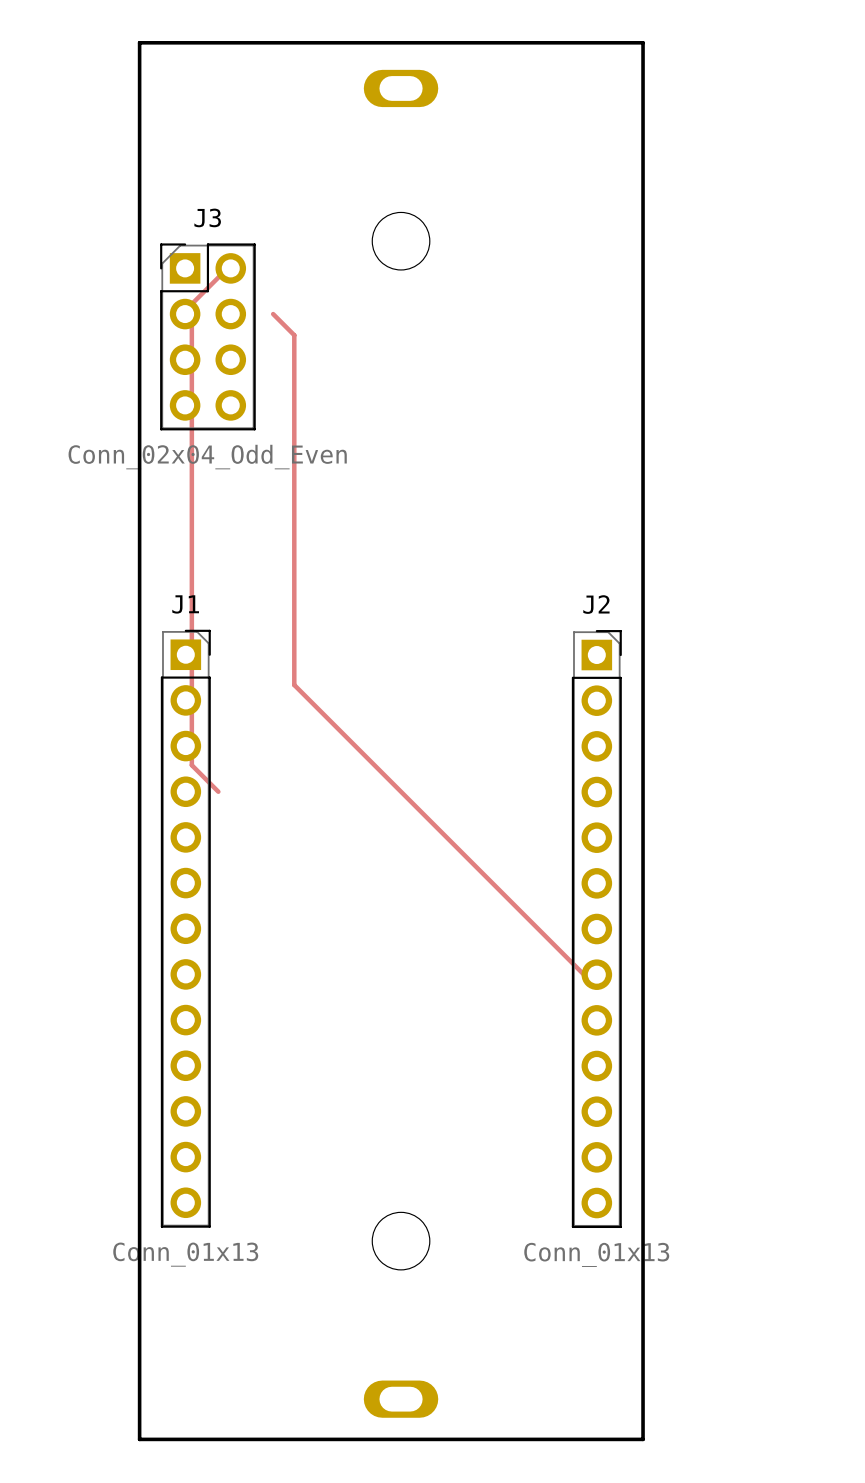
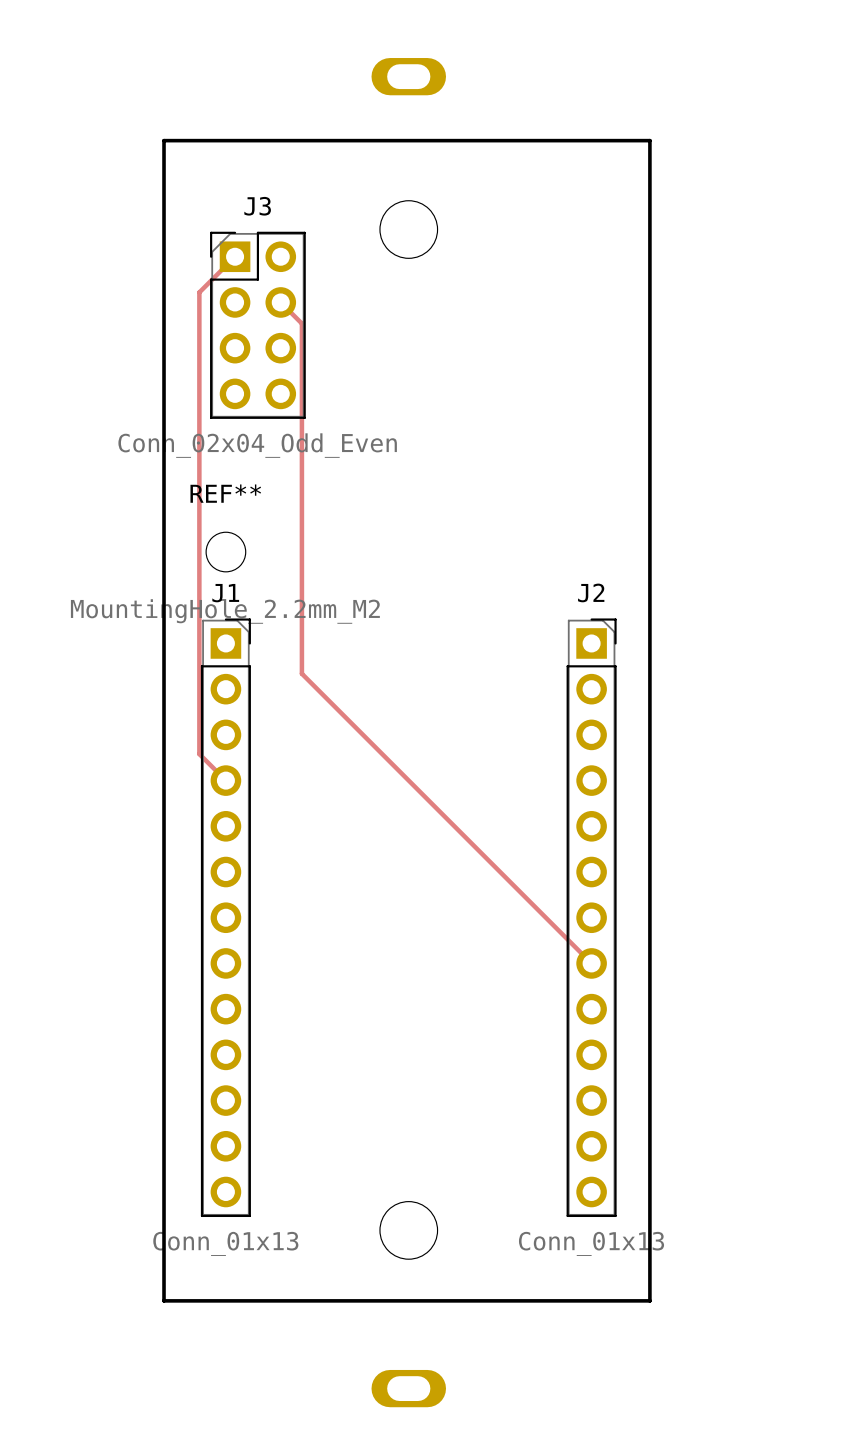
board edge: (139, 42) (643, 42) (643, 1439) (139, 1439) (139, 42) -> (164, 140) (164, 1300) (649, 1300) (649, 140) (164, 140)
J3 position: (207, 336) -> (257, 325)
REF**: none -> MountingHole_2.2mm_M2 (225, 552)
J1 position: (185, 928) -> (225, 917)
J2 position: (596, 929) -> (591, 917)

